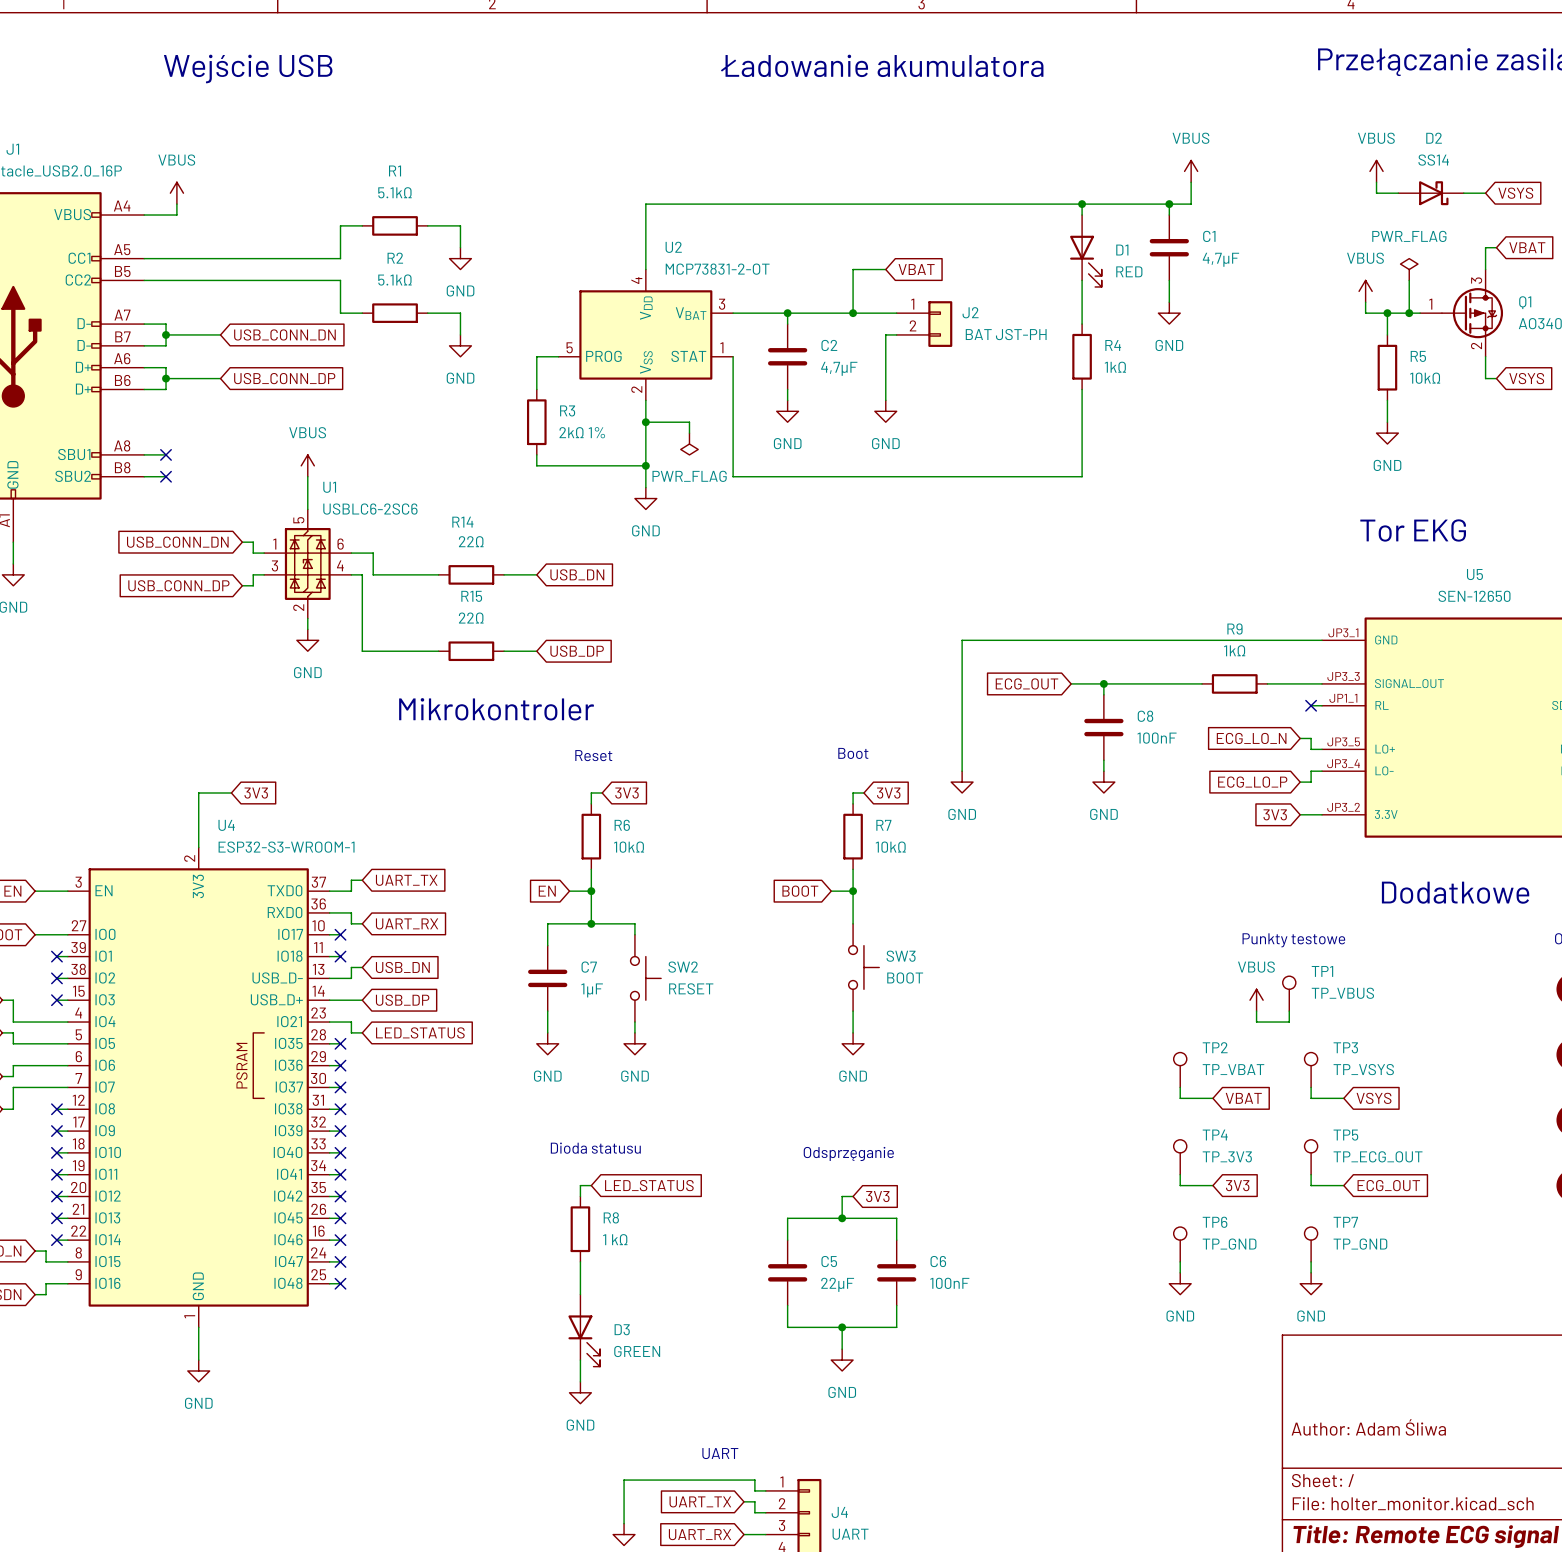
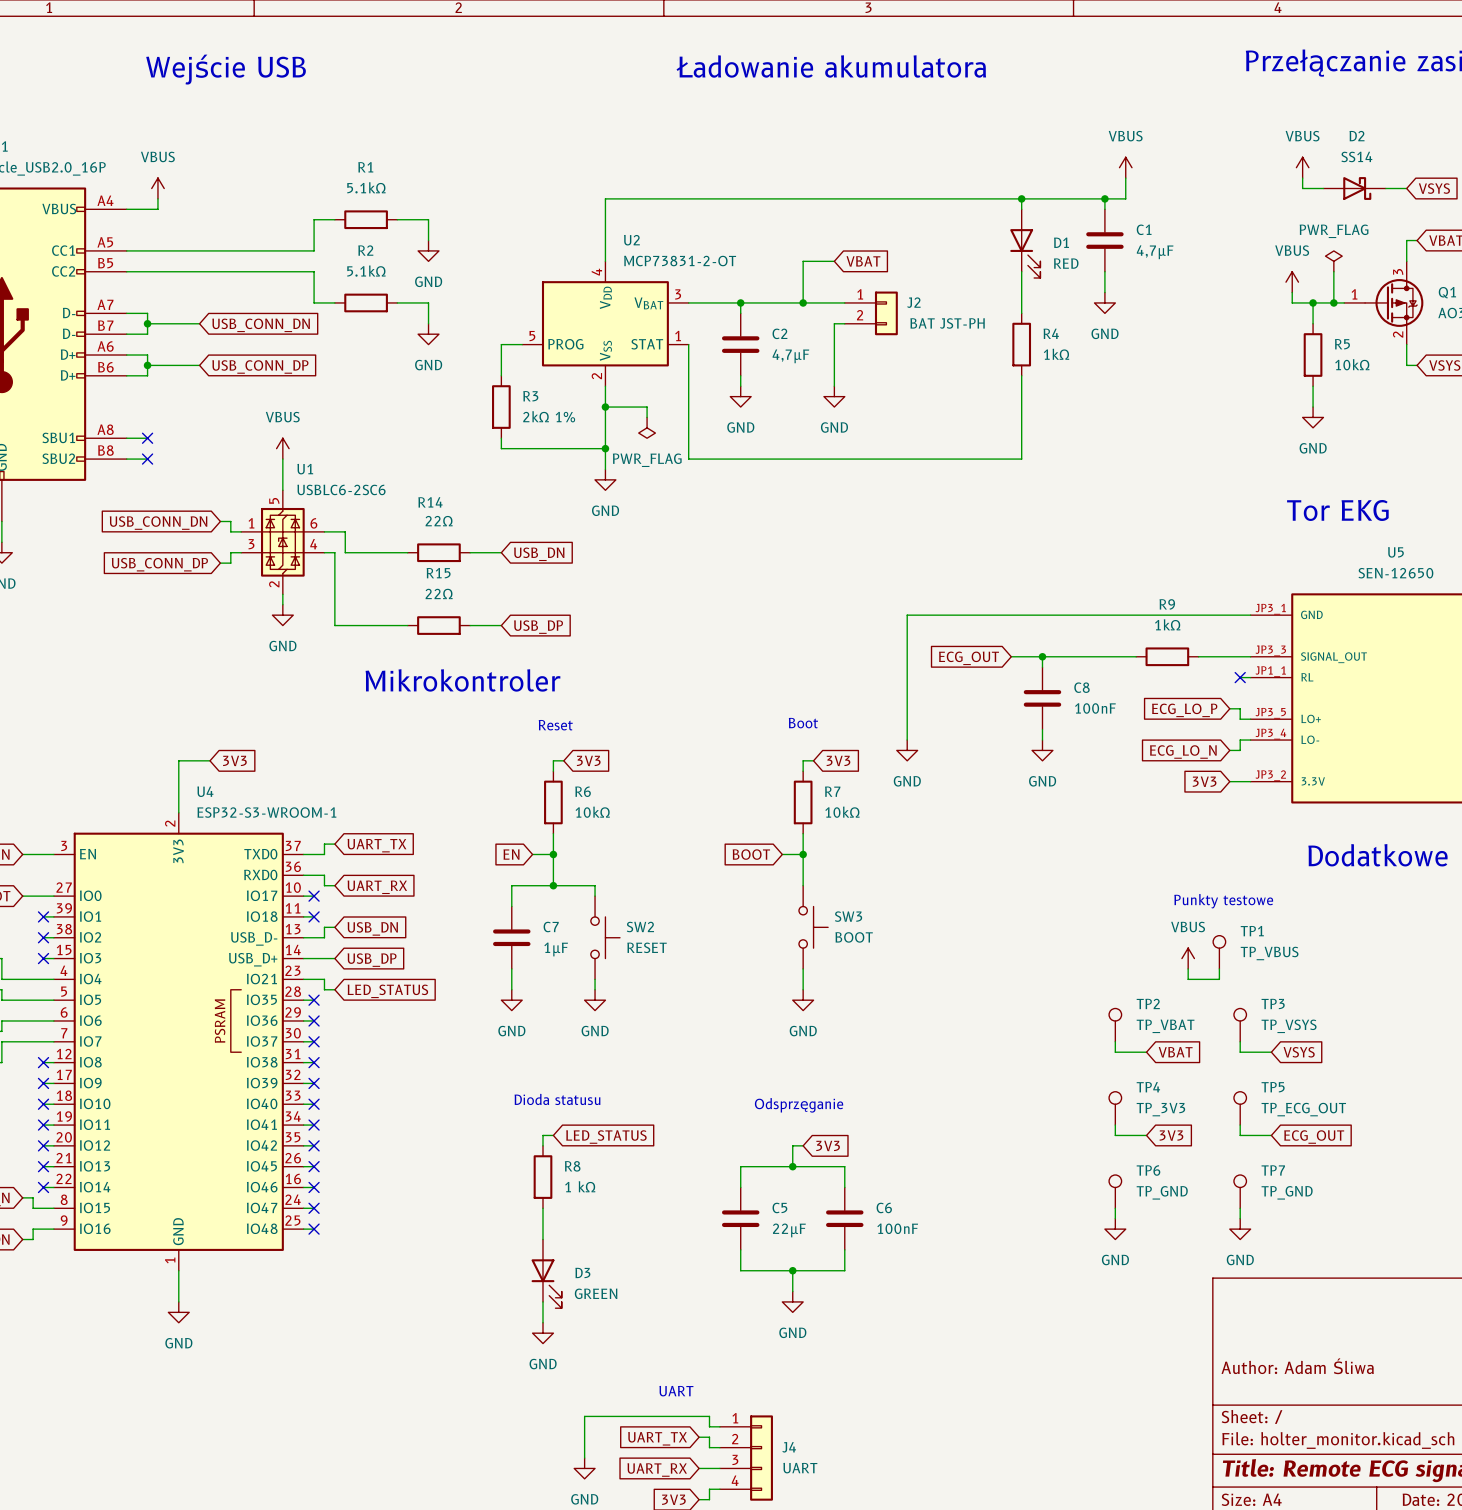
global label: ECG_LO_N (1251, 738) -> ECG_LO_P (1184, 710)
global label: ECG_LO_P (1252, 782) -> ECG_LO_N (1183, 751)

